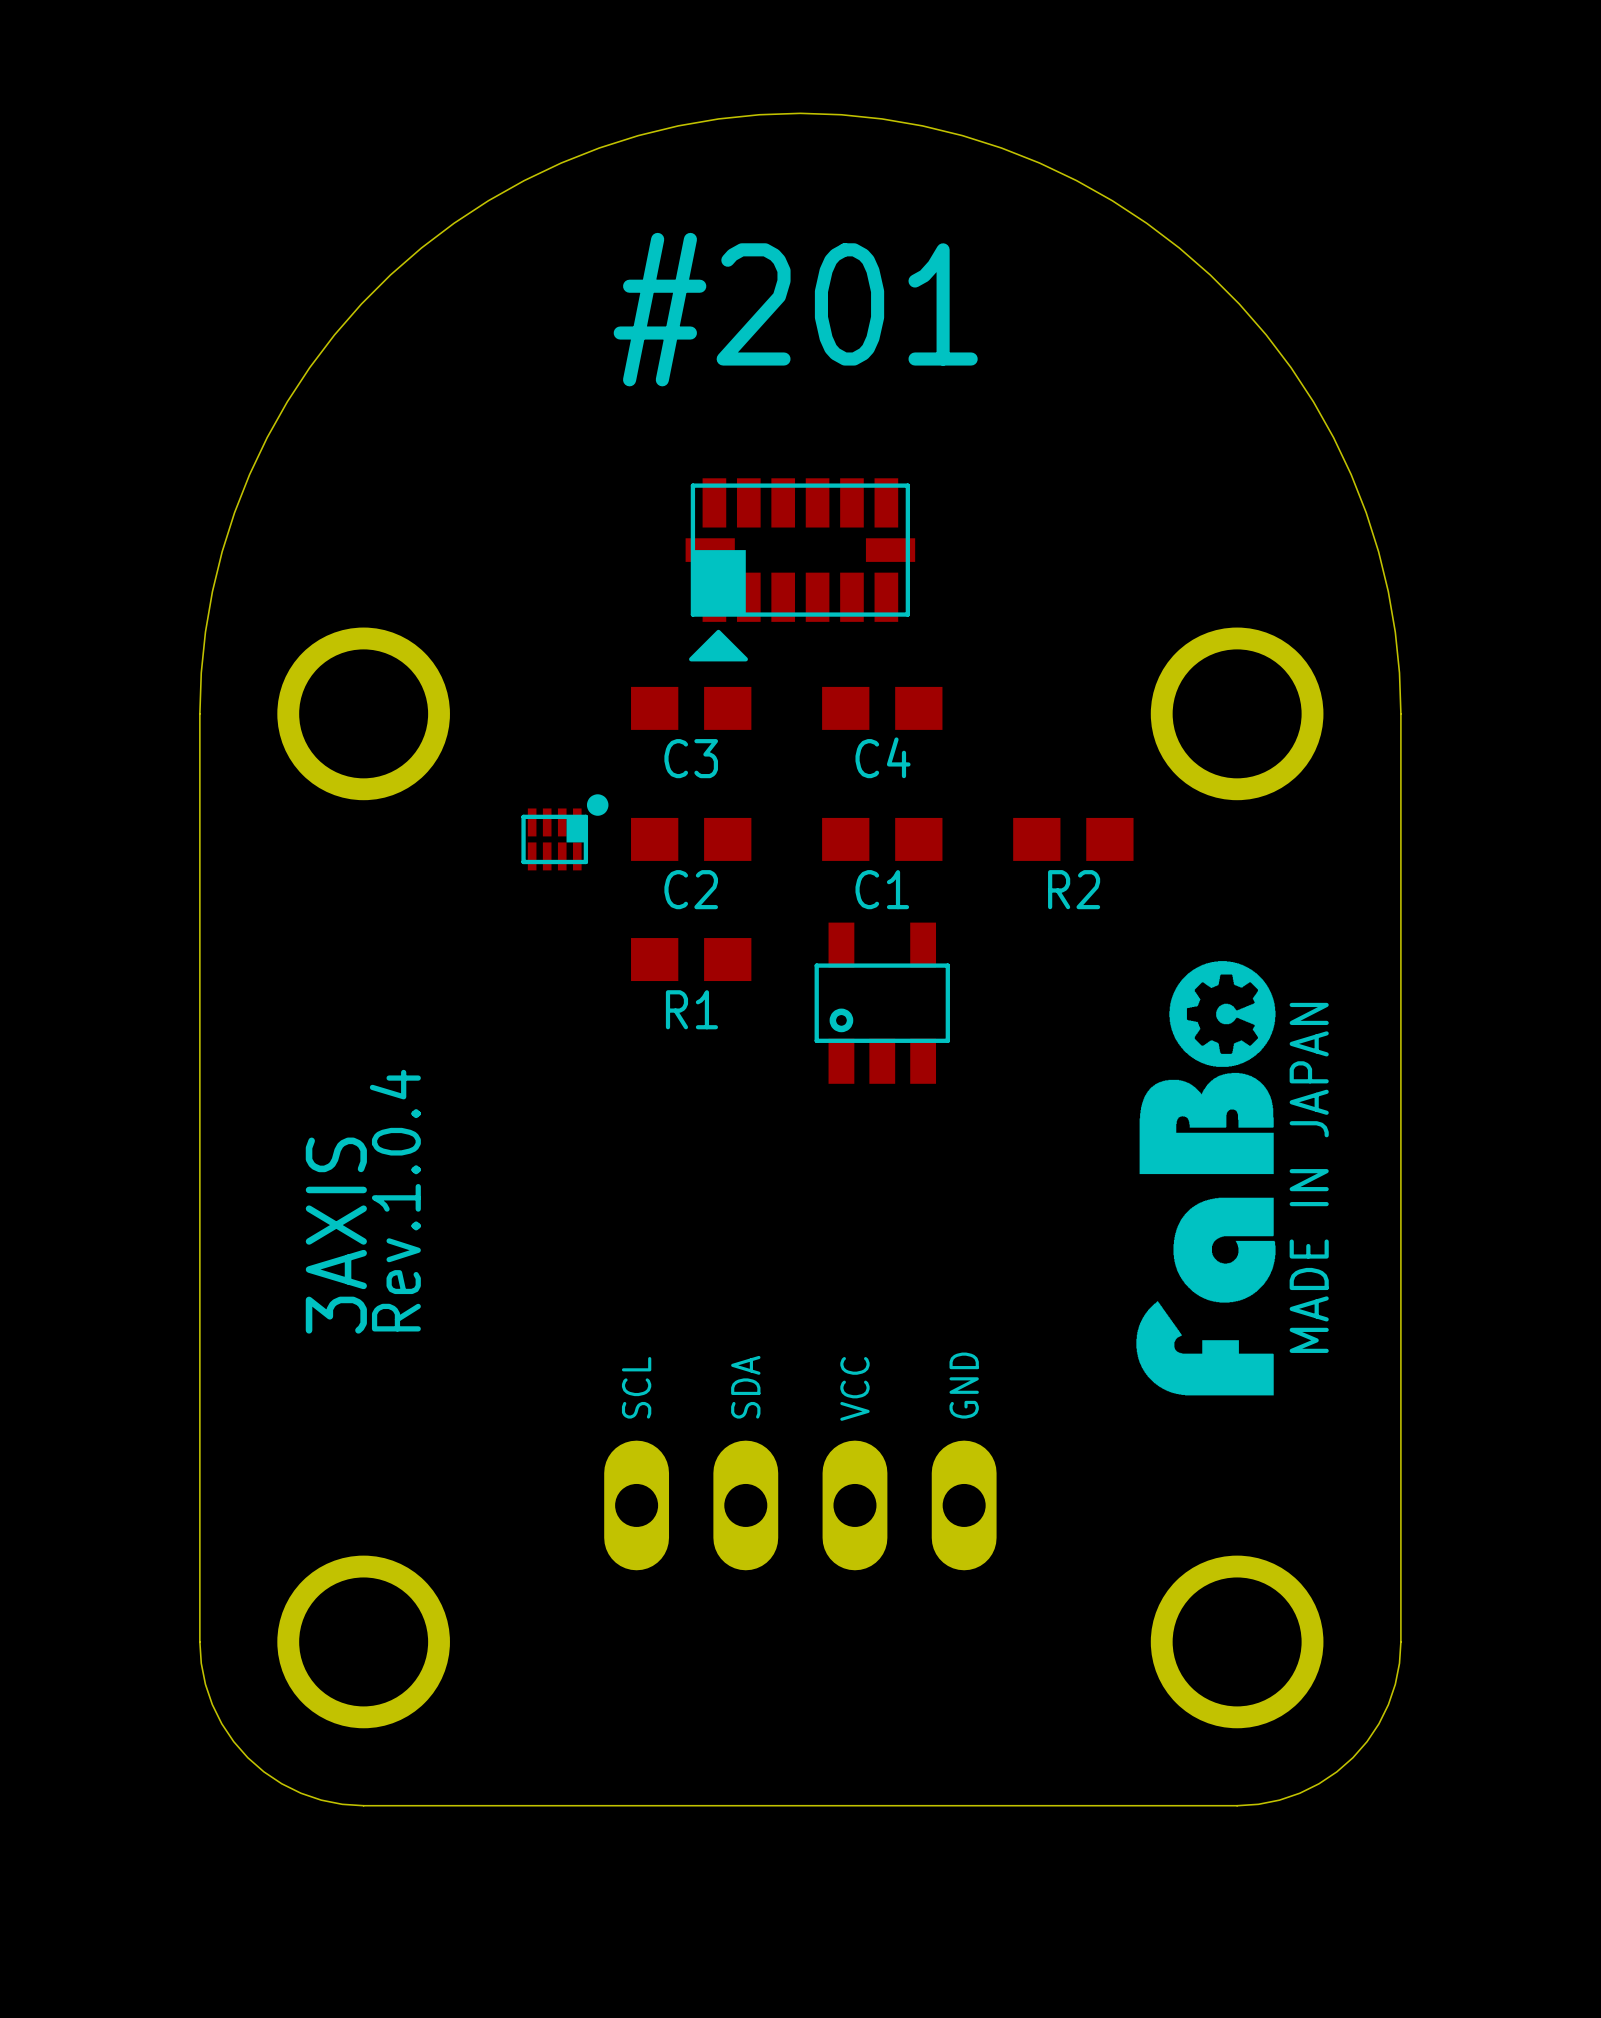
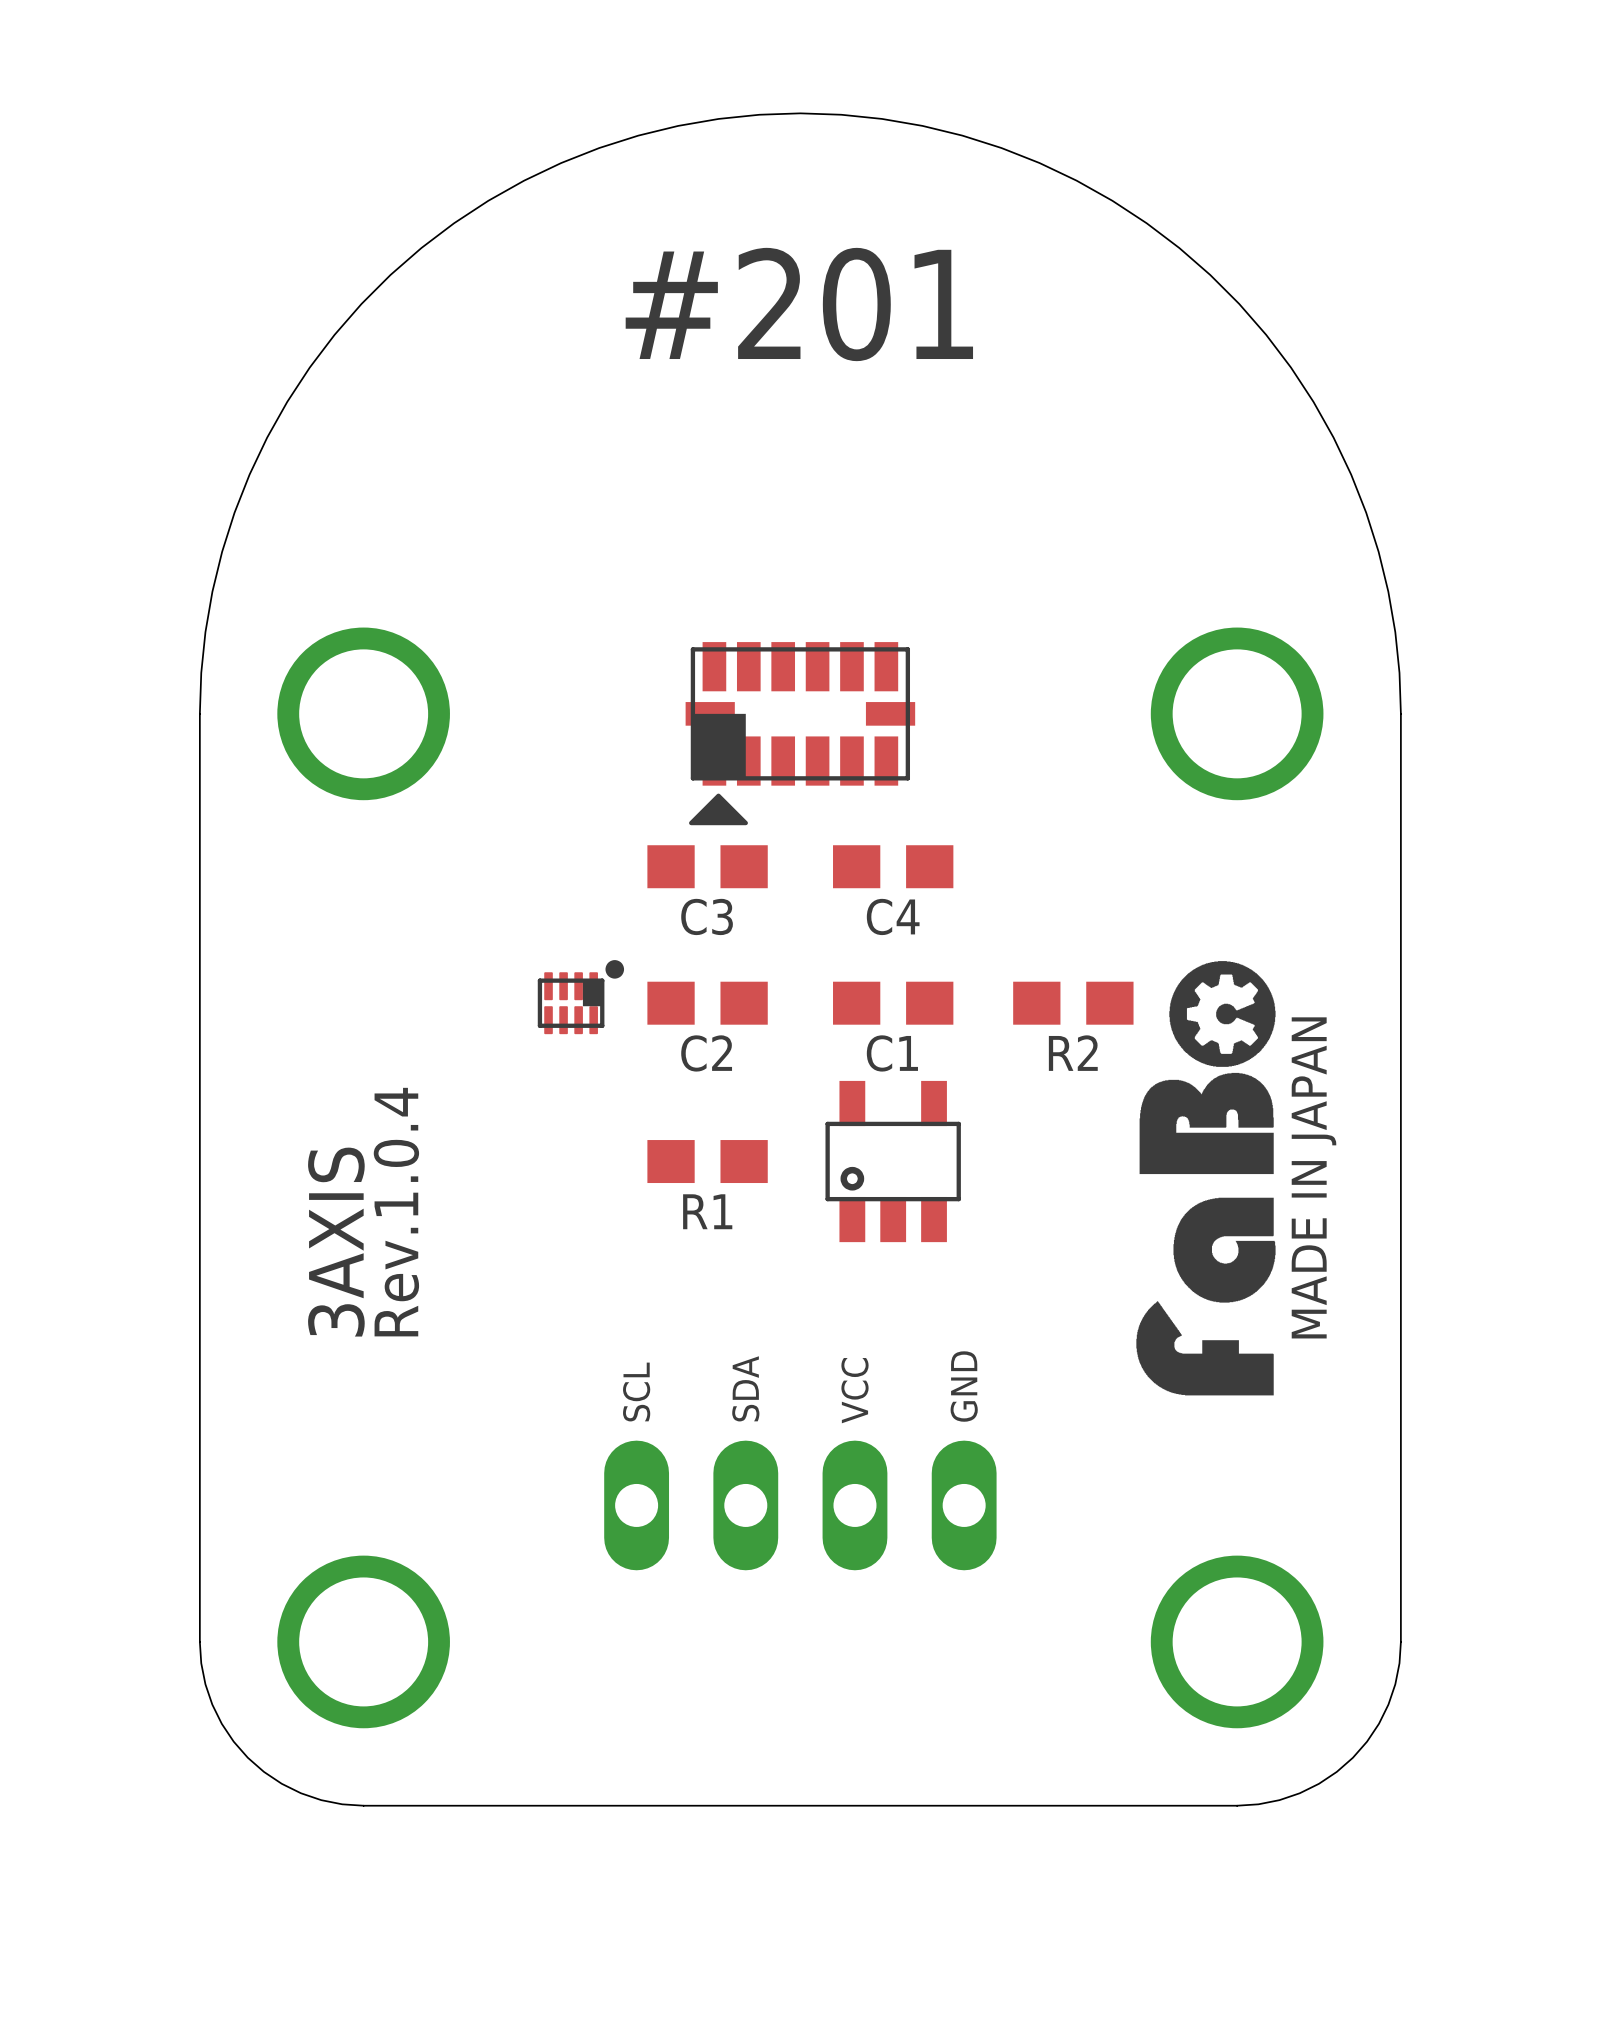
part position: (800, 569) -> (800, 733)
C3 position: (691, 708) -> (707, 866)
C4 position: (882, 708) -> (893, 866)
part: (564, 832) -> none
C2 position: (691, 839) -> (707, 1003)
C1 position: (882, 839) -> (893, 1003)
R2 position: (1073, 839) -> (1073, 1003)
R1 position: (691, 959) -> (707, 1161)
part: none -> (580, 997)
part position: (882, 1003) -> (893, 1161)

